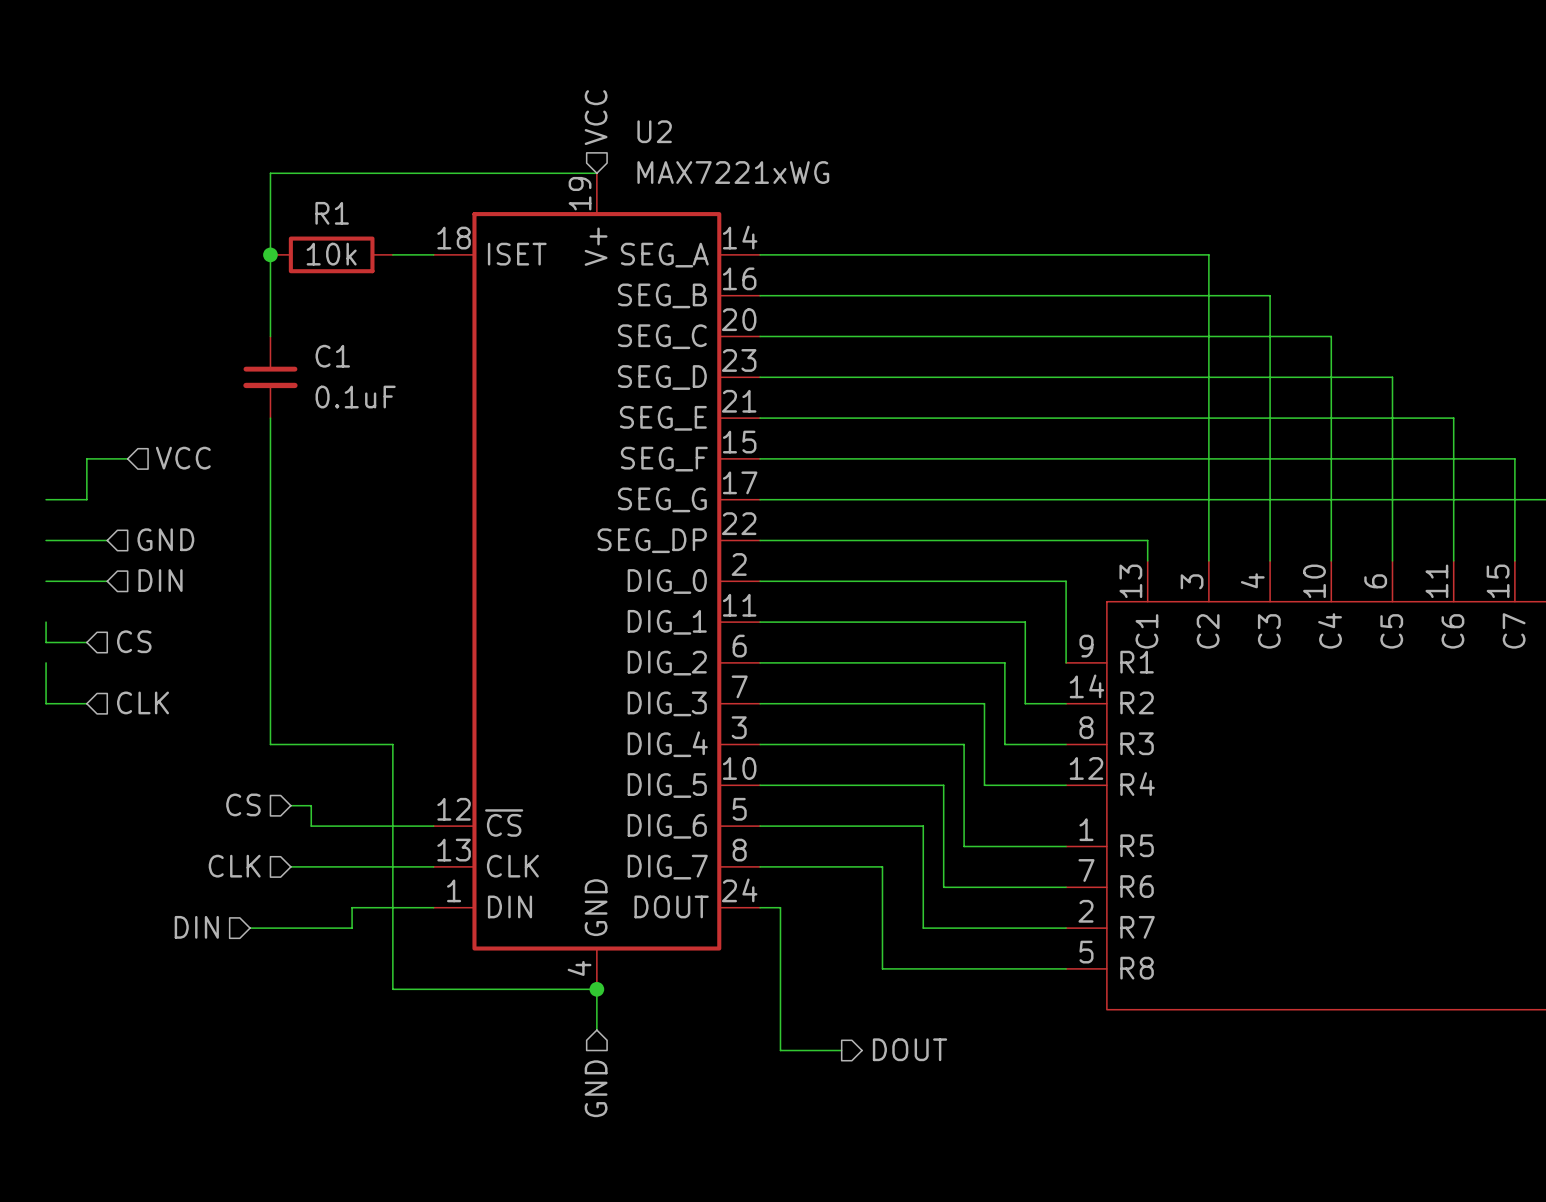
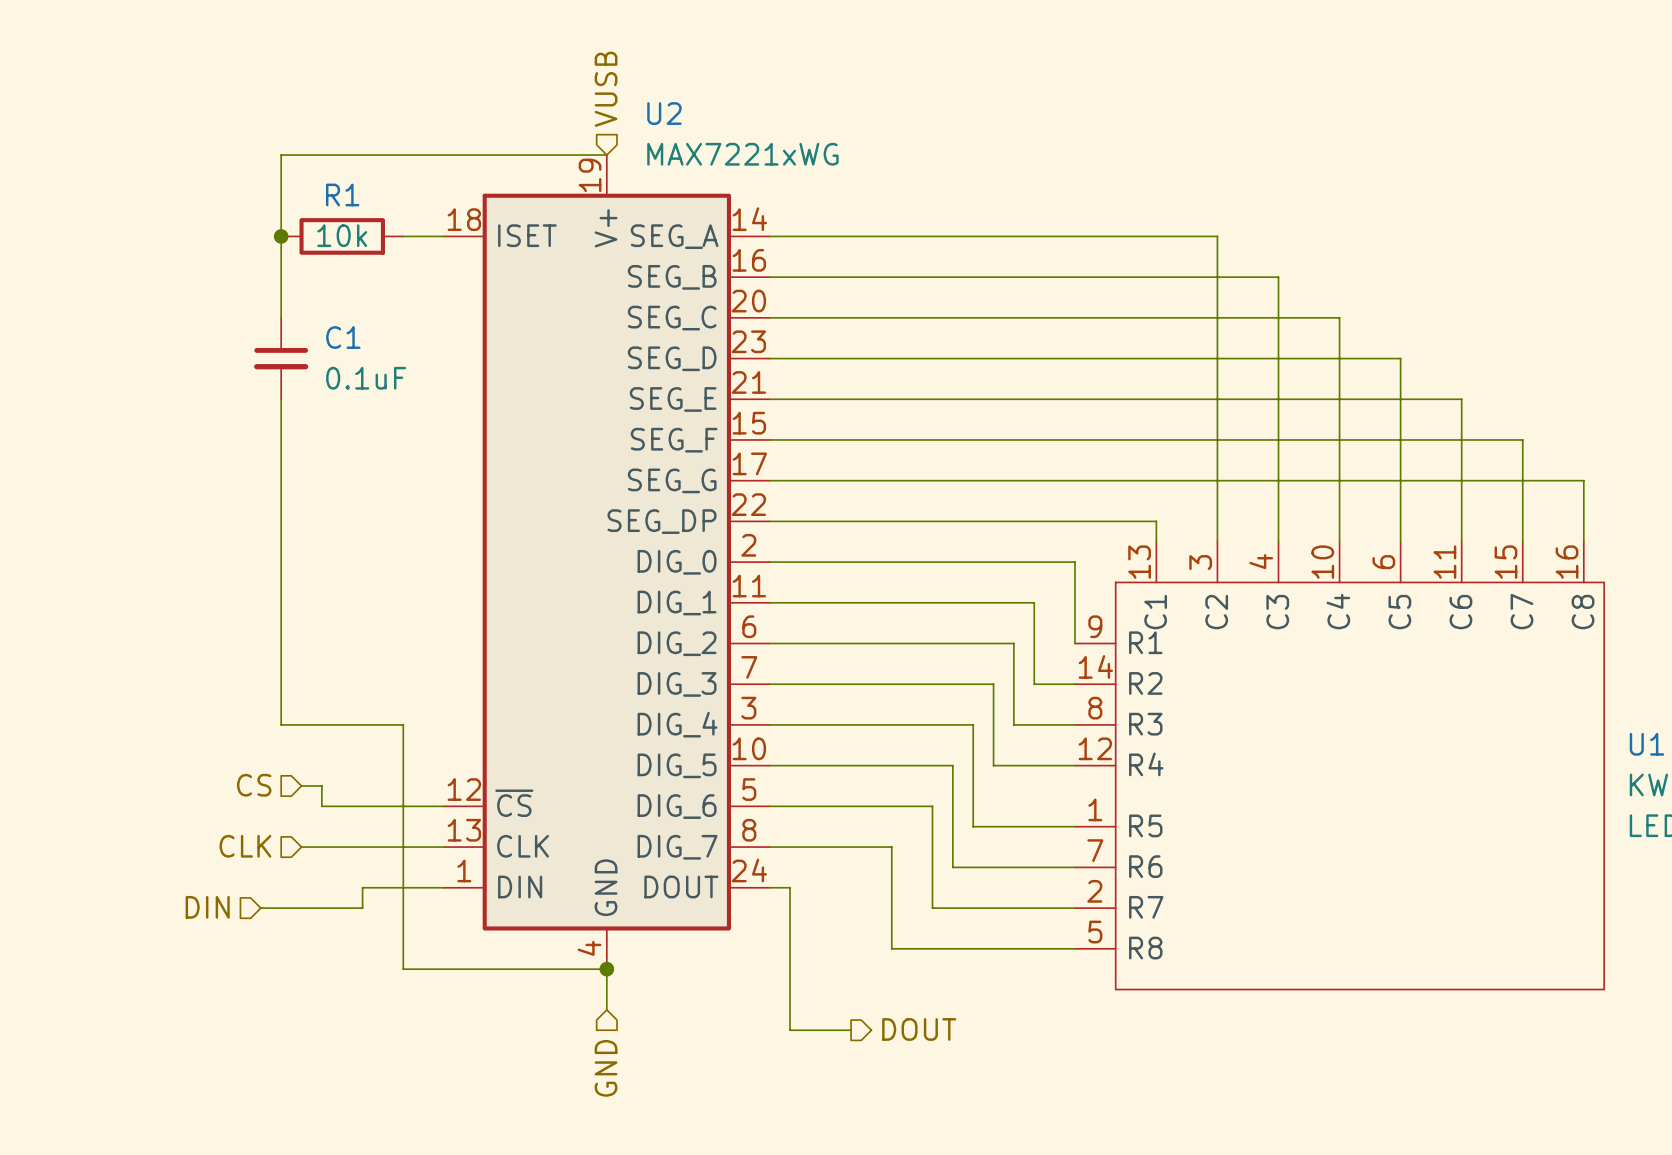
hierarchical label: VCC (596, 117) -> VUSB (606, 89)
wire: (127, 458) (86, 458) (86, 499) (46, 499) -> none
hierarchical label: VCC (183, 458) -> none
hierarchical label: GND (165, 539) -> none
wire: (46, 540) (107, 540) -> none
hierarchical label: DIN (160, 580) -> none
wire: (46, 581) (107, 581) -> none
wire: (46, 622) (46, 642) (86, 642) -> none
hierarchical label: CS (134, 641) -> none
wire: (46, 662) (46, 703) (86, 703) -> none
hierarchical label: CLK (143, 702) -> none

